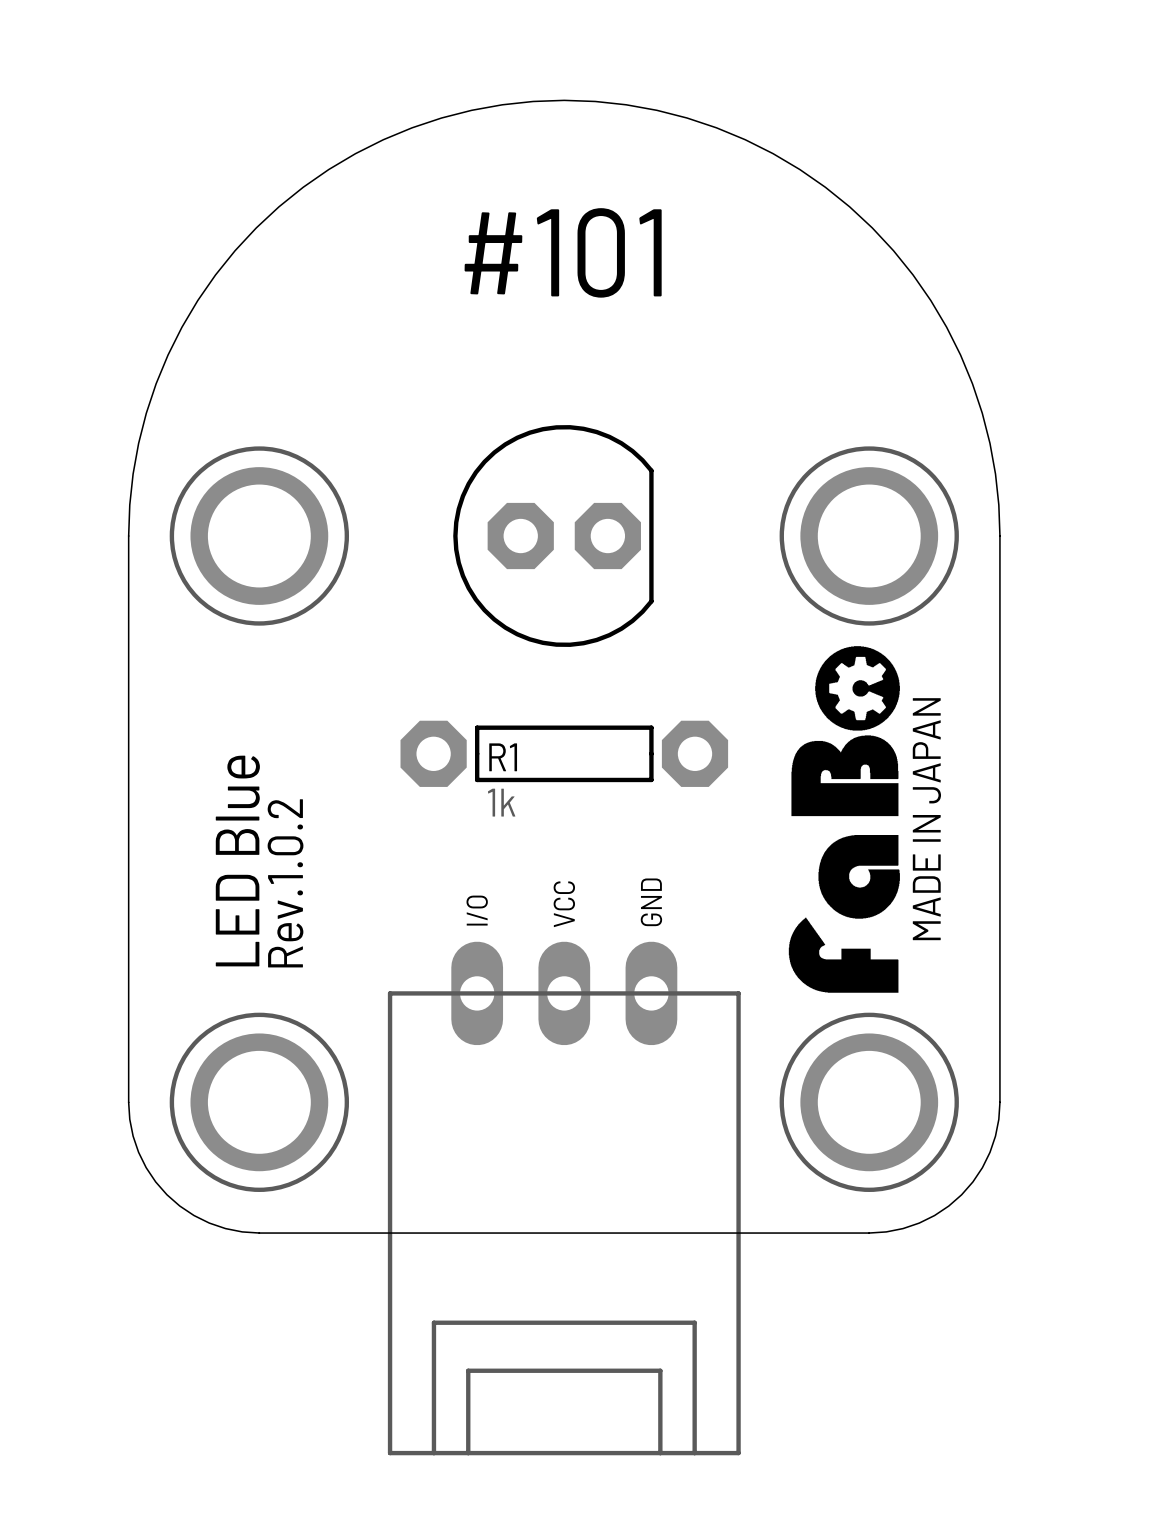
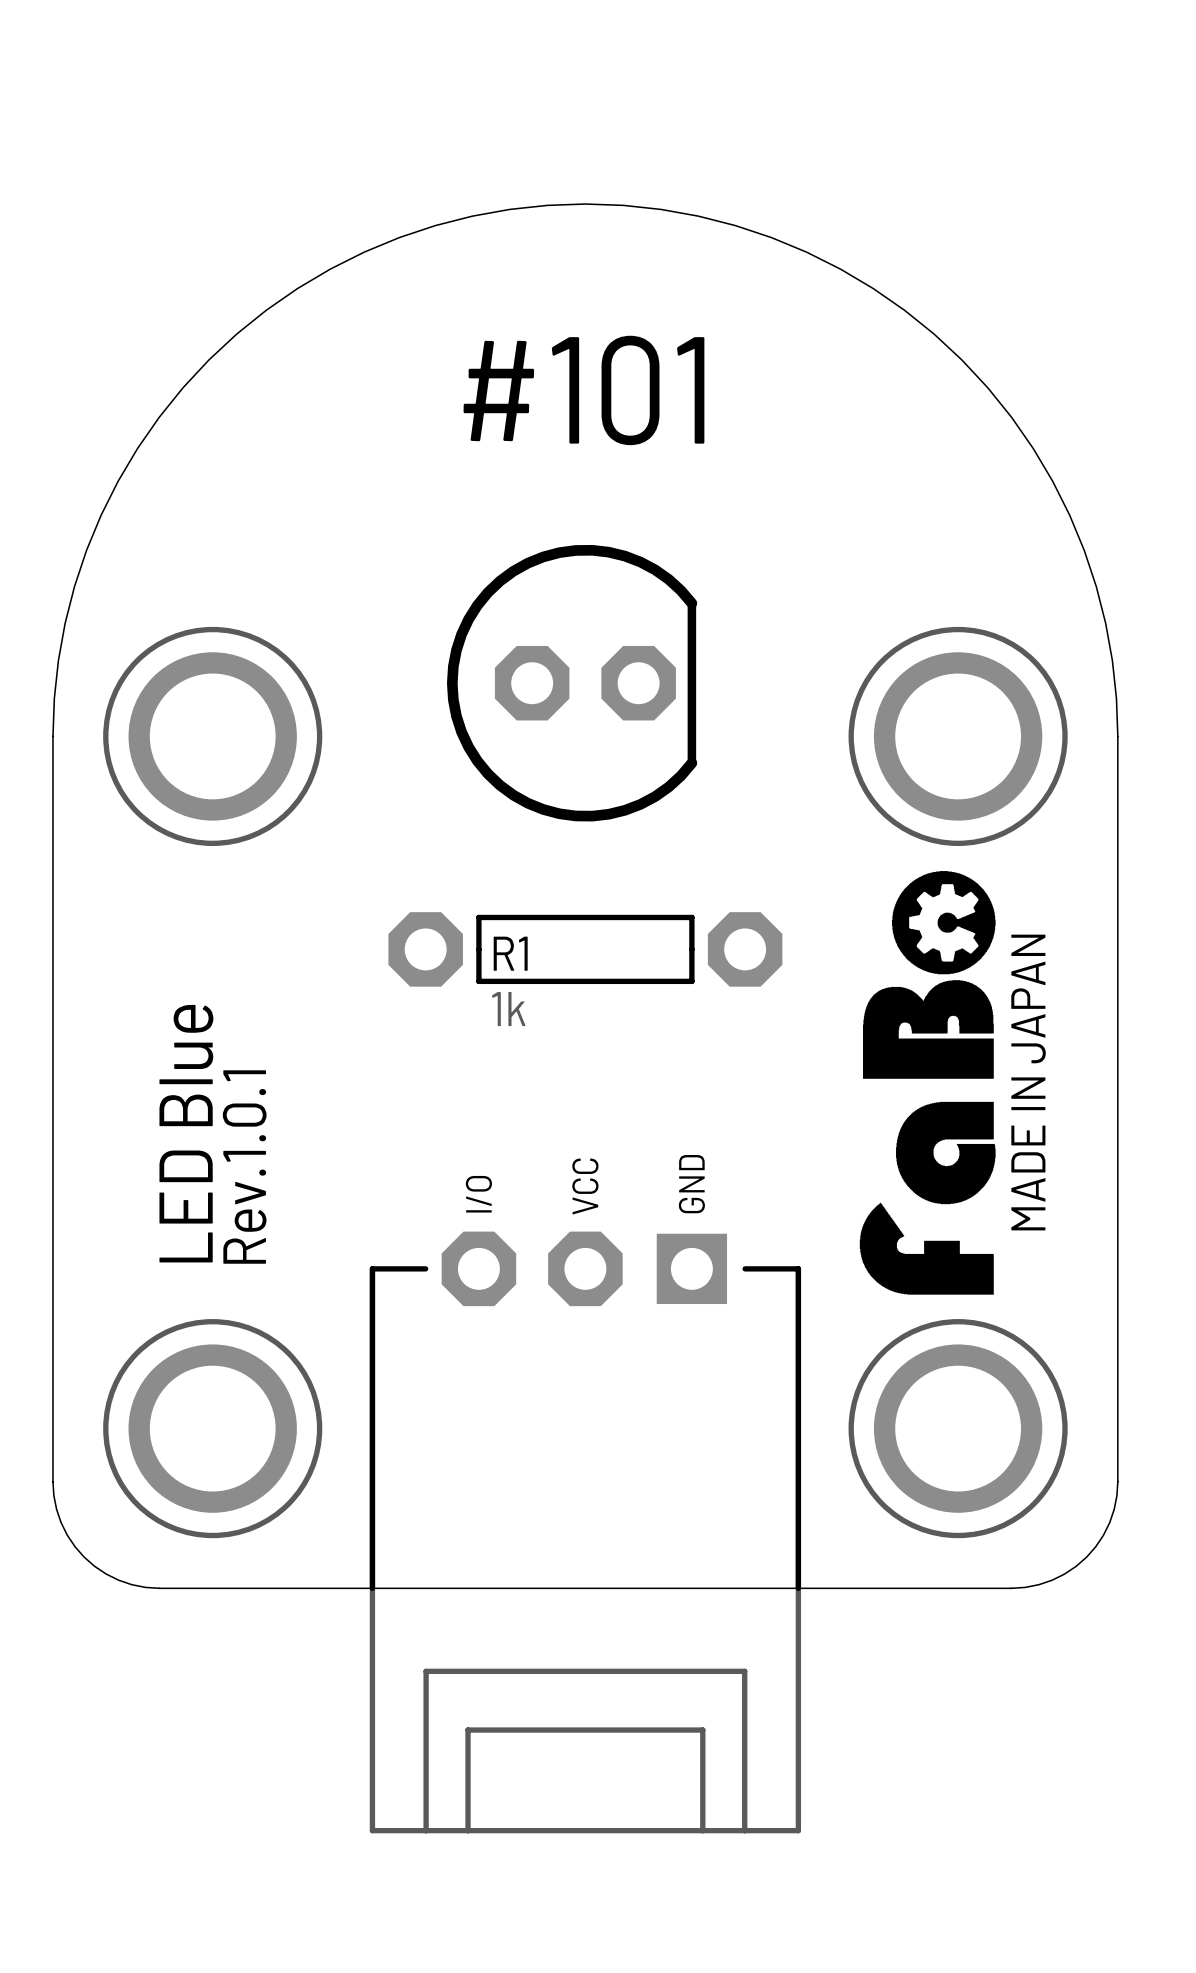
part footprint: [128, 100, 1000, 1456] -> [52, 204, 1118, 1834]
part: none -> (572, 683)
part: (553, 536) -> none
R1 footprint: [400, 720, 729, 787] -> [388, 912, 783, 987]
text: Rev.1.0.2 (285, 883) -> Rev.1.0.1 (244, 1167)

